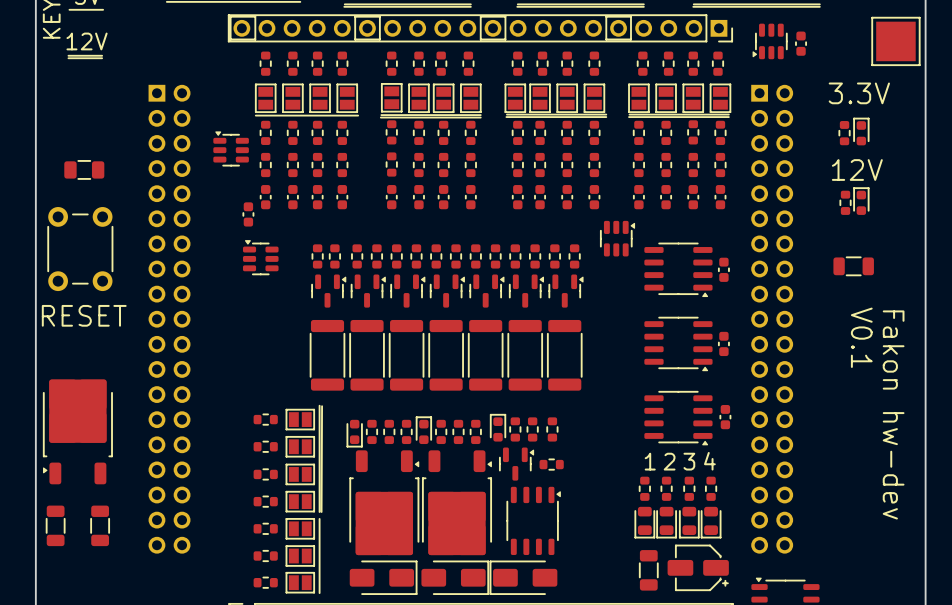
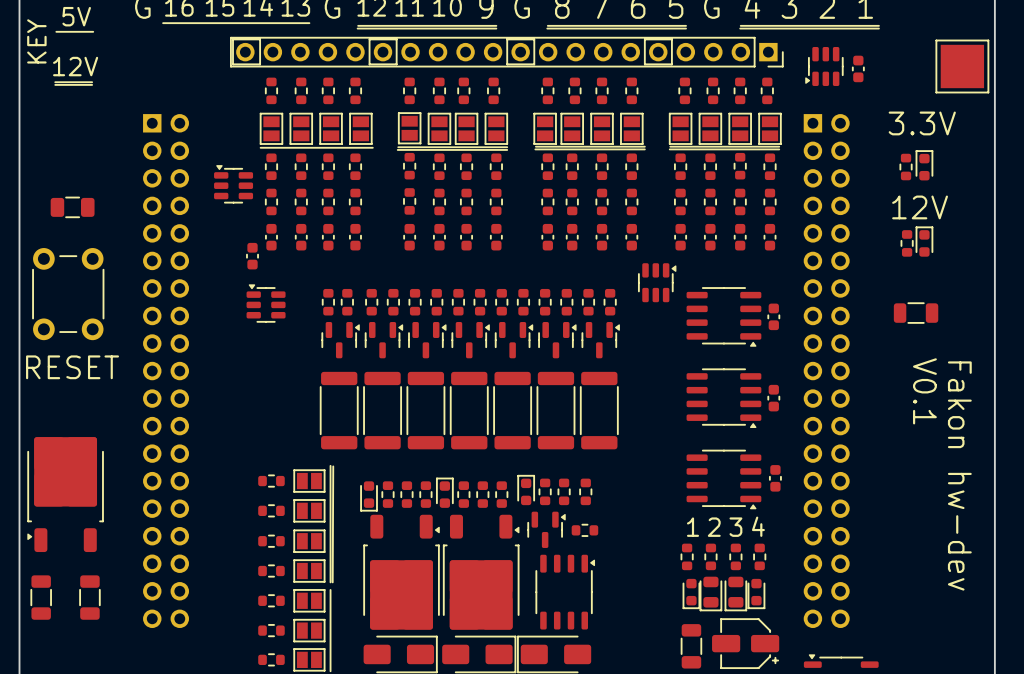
part footprint: [634, 506, 655, 539] -> [682, 578, 701, 609]
part footprint: [700, 506, 722, 539] -> [747, 578, 766, 609]

